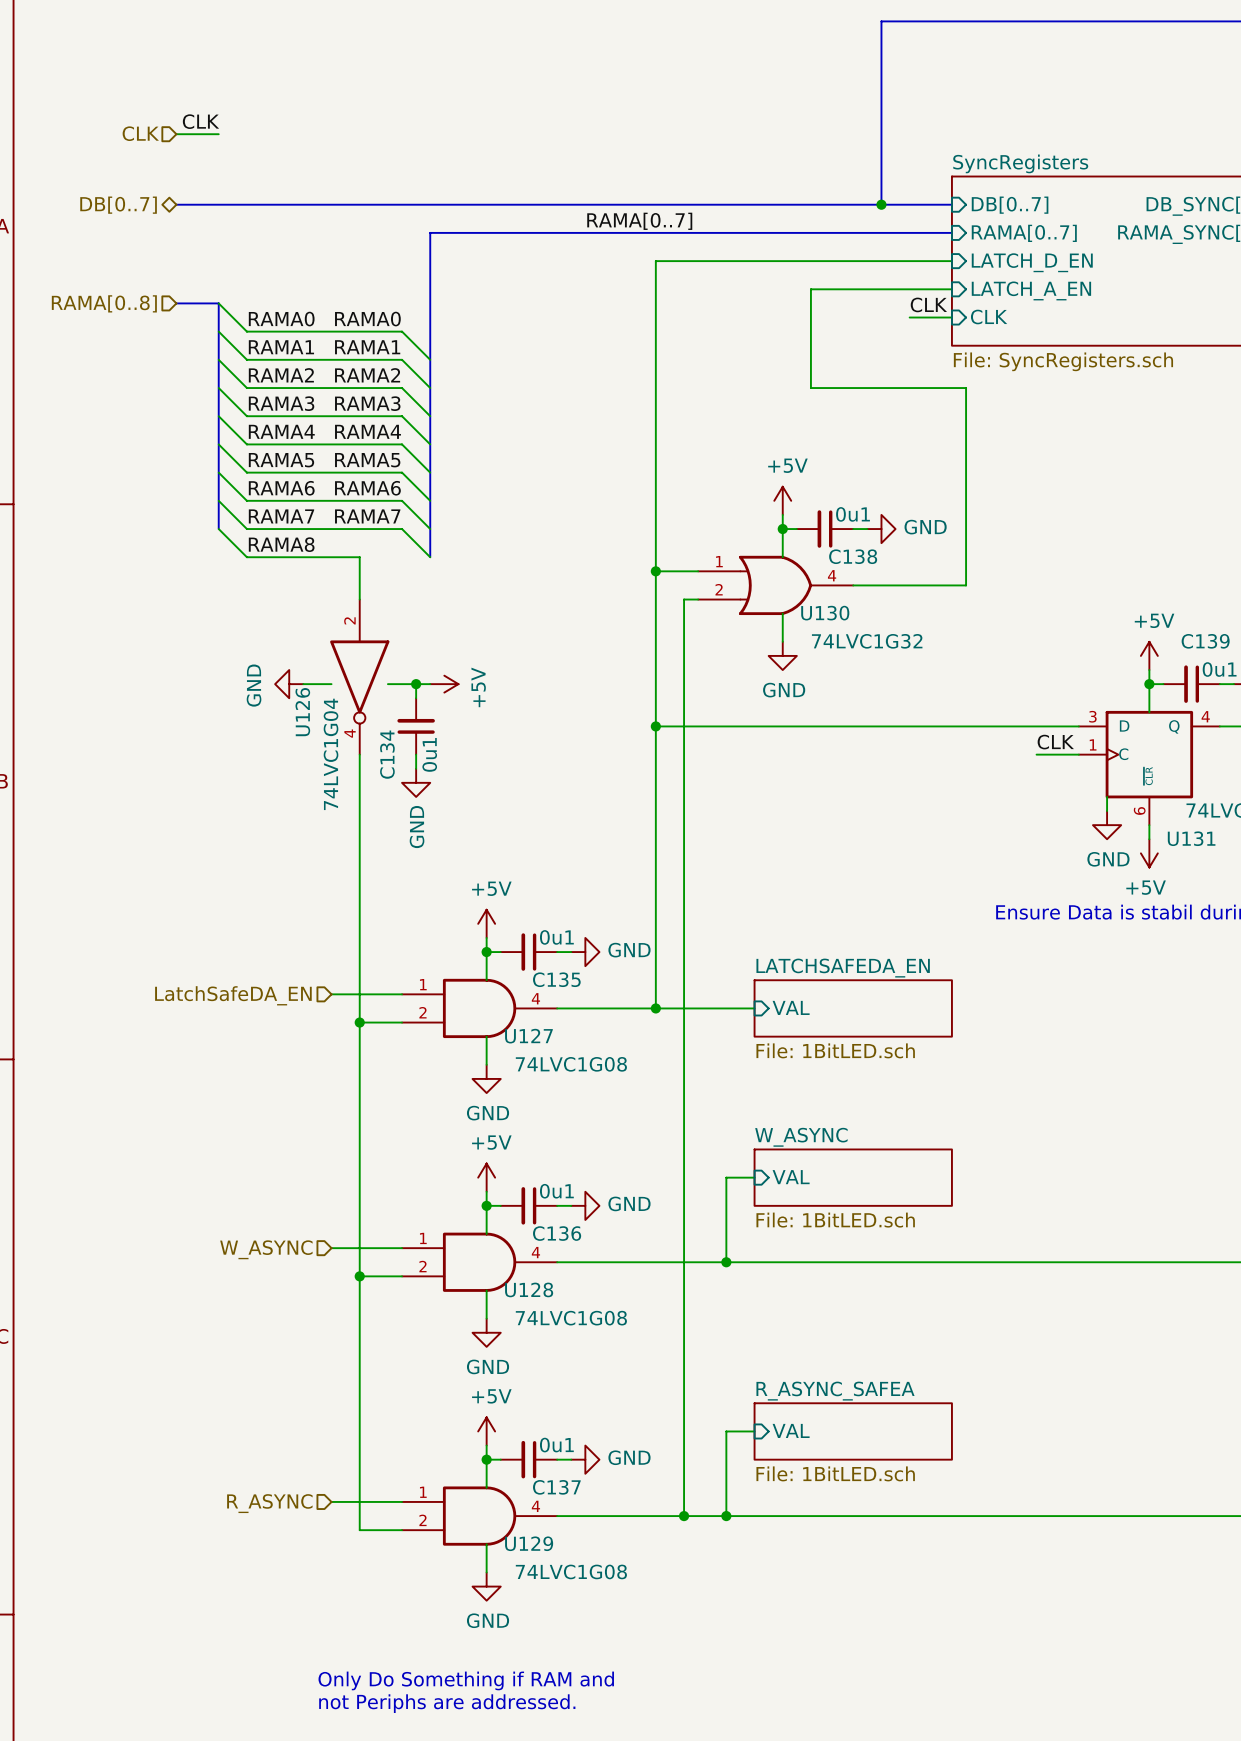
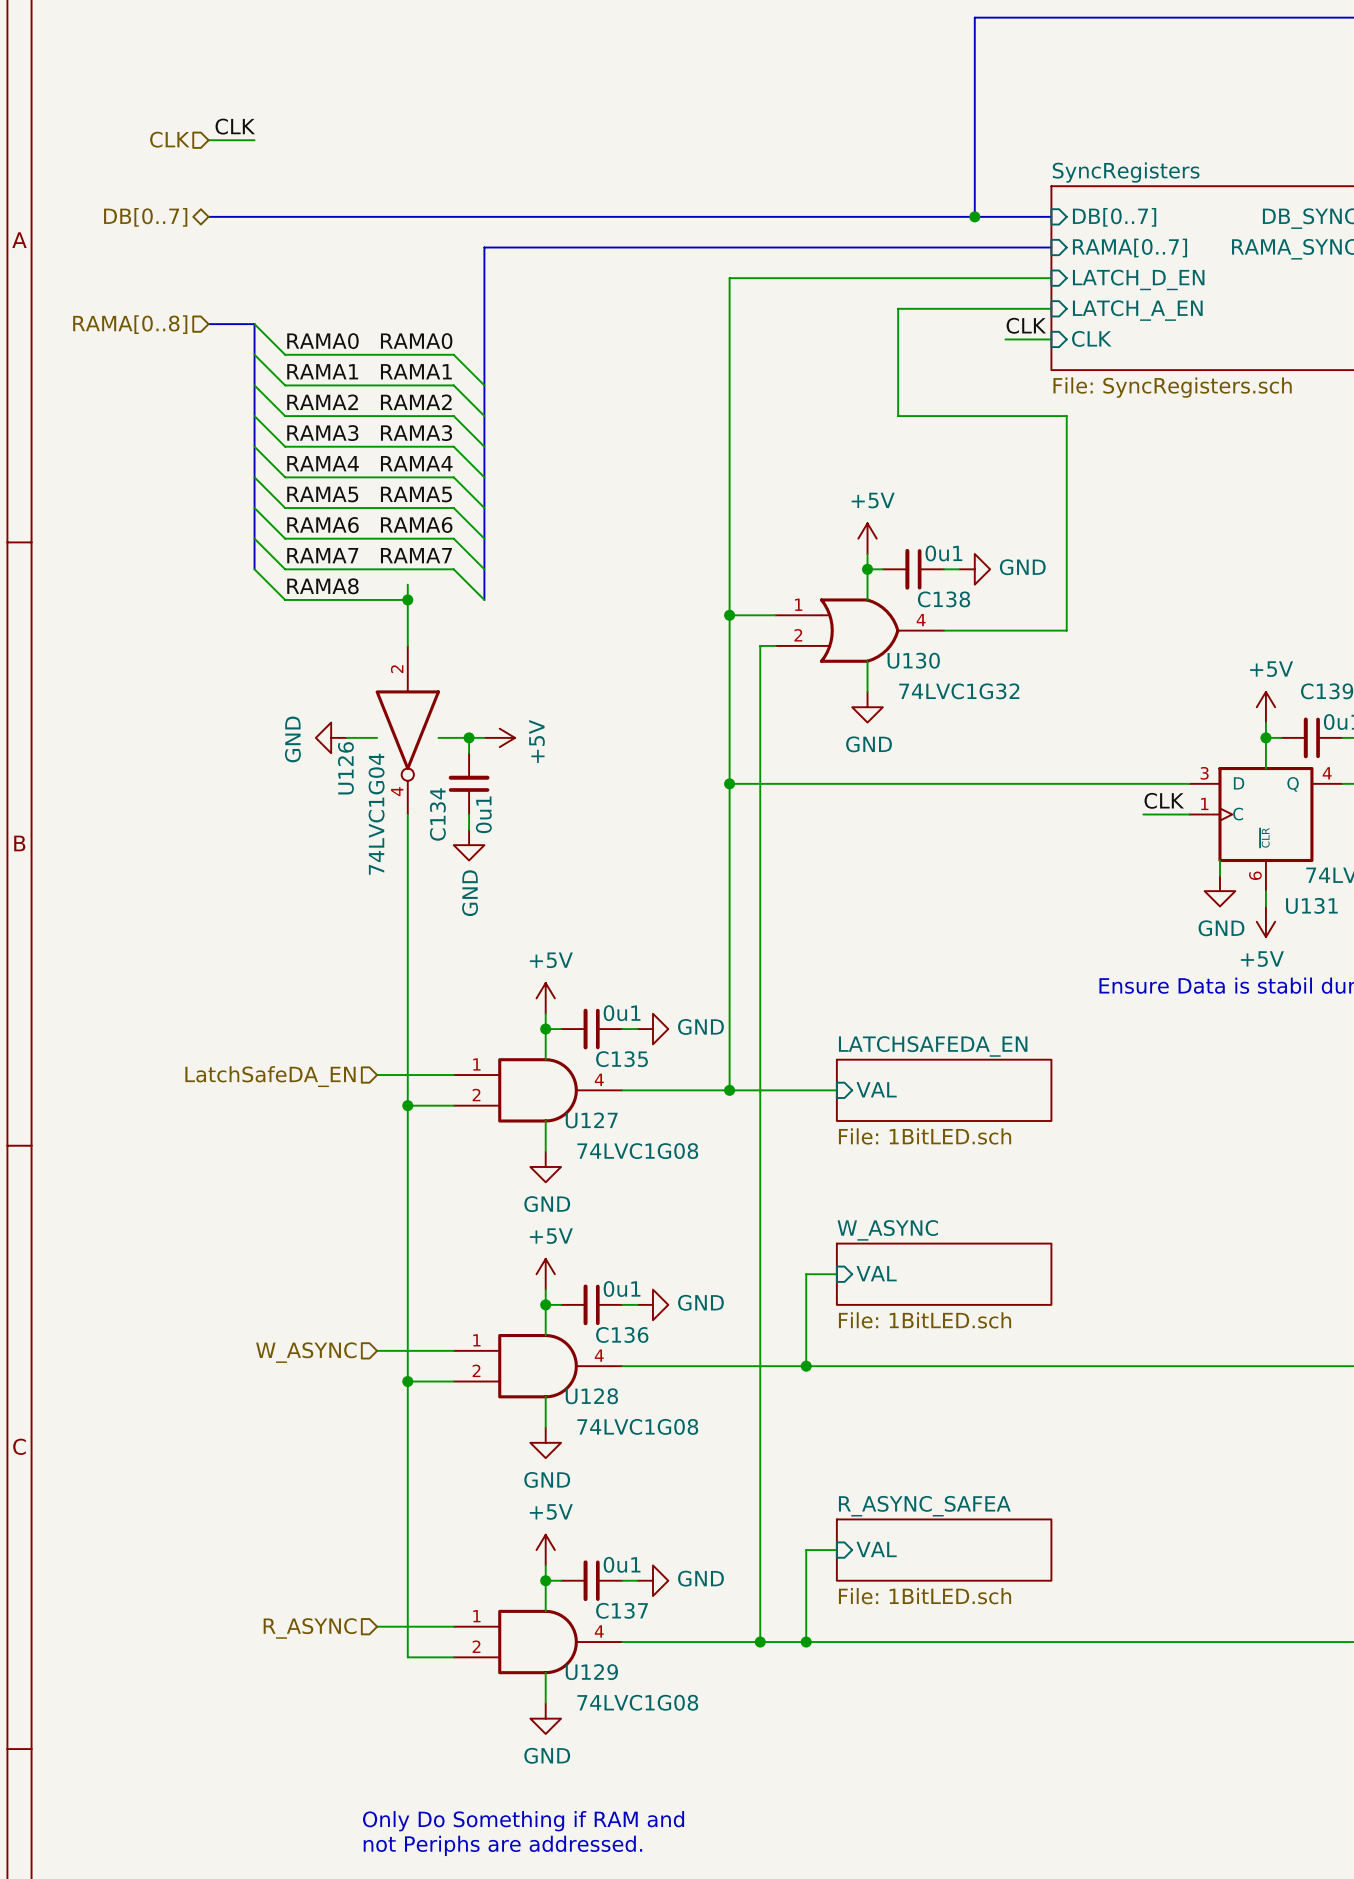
label: RAMA[0..7] (639, 221) -> none
wire: none -> (407, 584) (407, 599)
junction: none -> (407, 599)

